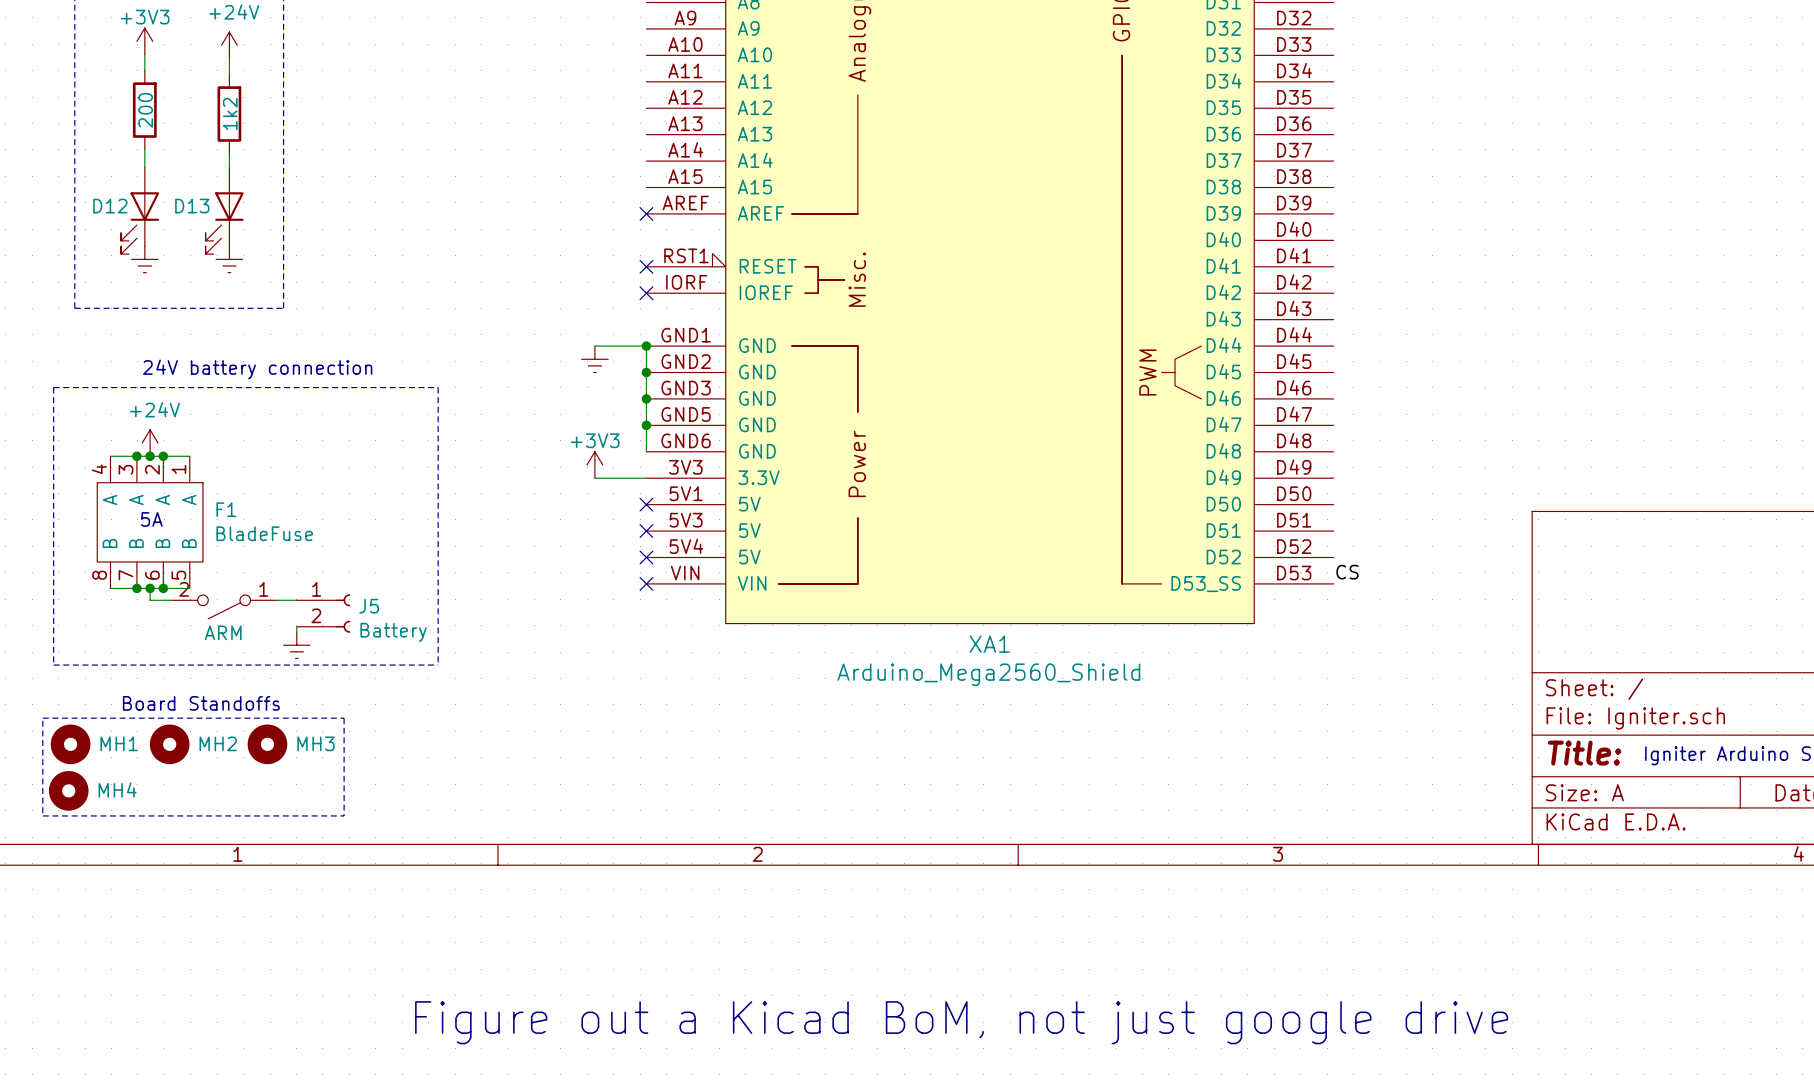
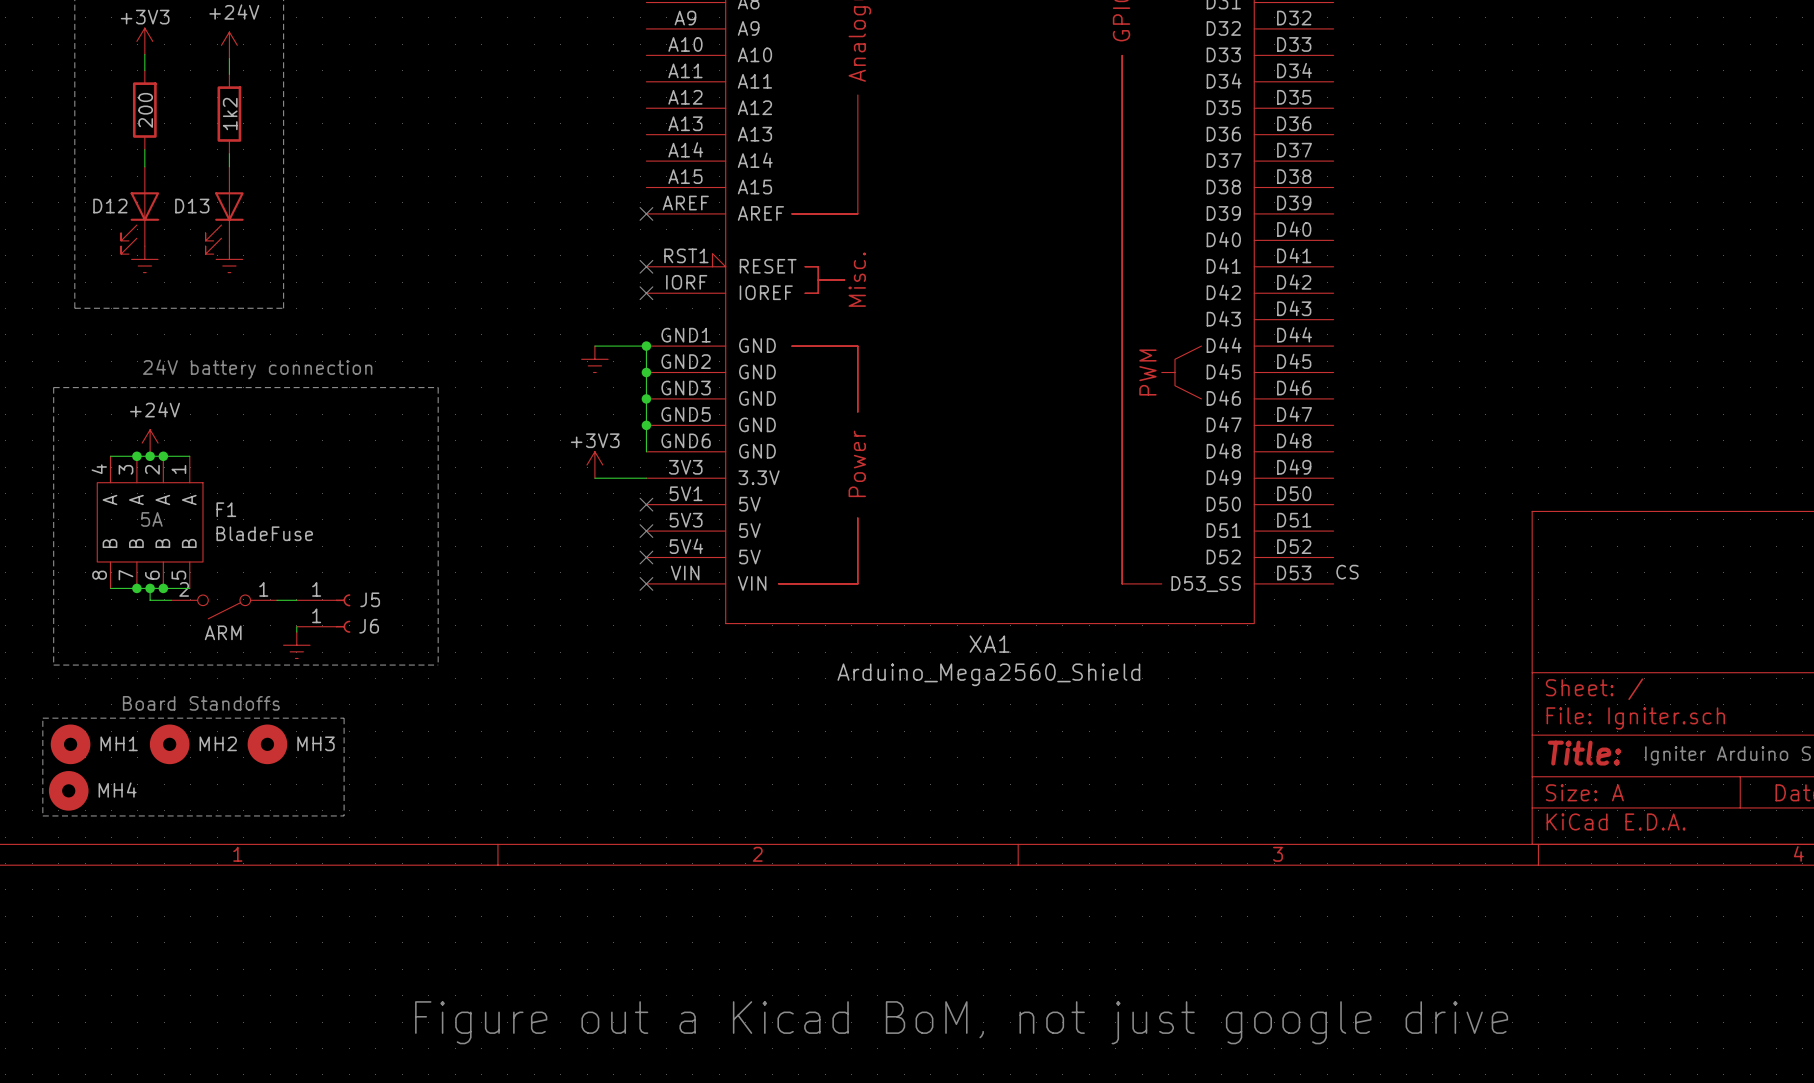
J5 symbol: [296, 594, 351, 633] -> [296, 594, 351, 607]
J6: none -> (323, 626)
J5 value: Battery (393, 632) -> none

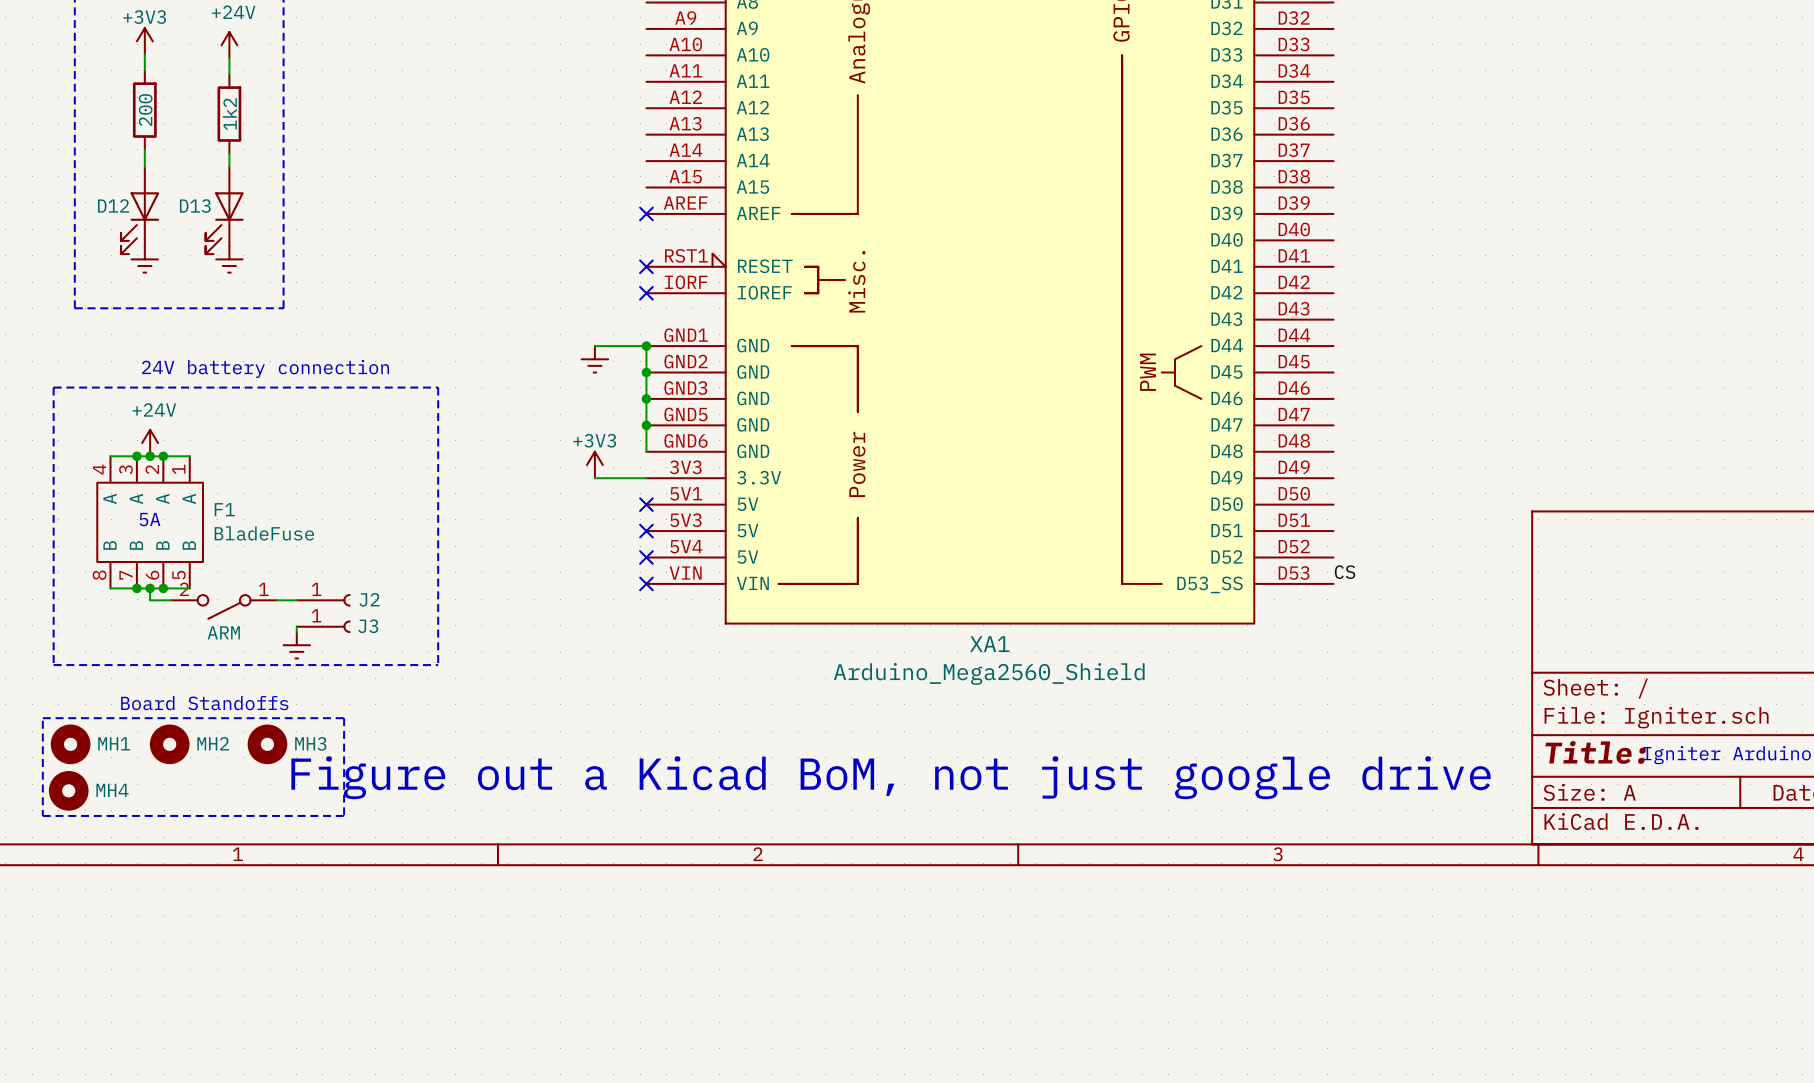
J5 name: J5 (370, 599) -> J2 (369, 599)
J6 name: J6 (369, 626) -> J3 (368, 626)
text position: Figure out a Kicad BoM, not just google drive (961, 1022) -> Figure out a Kicad BoM, not just google drive (891, 777)

